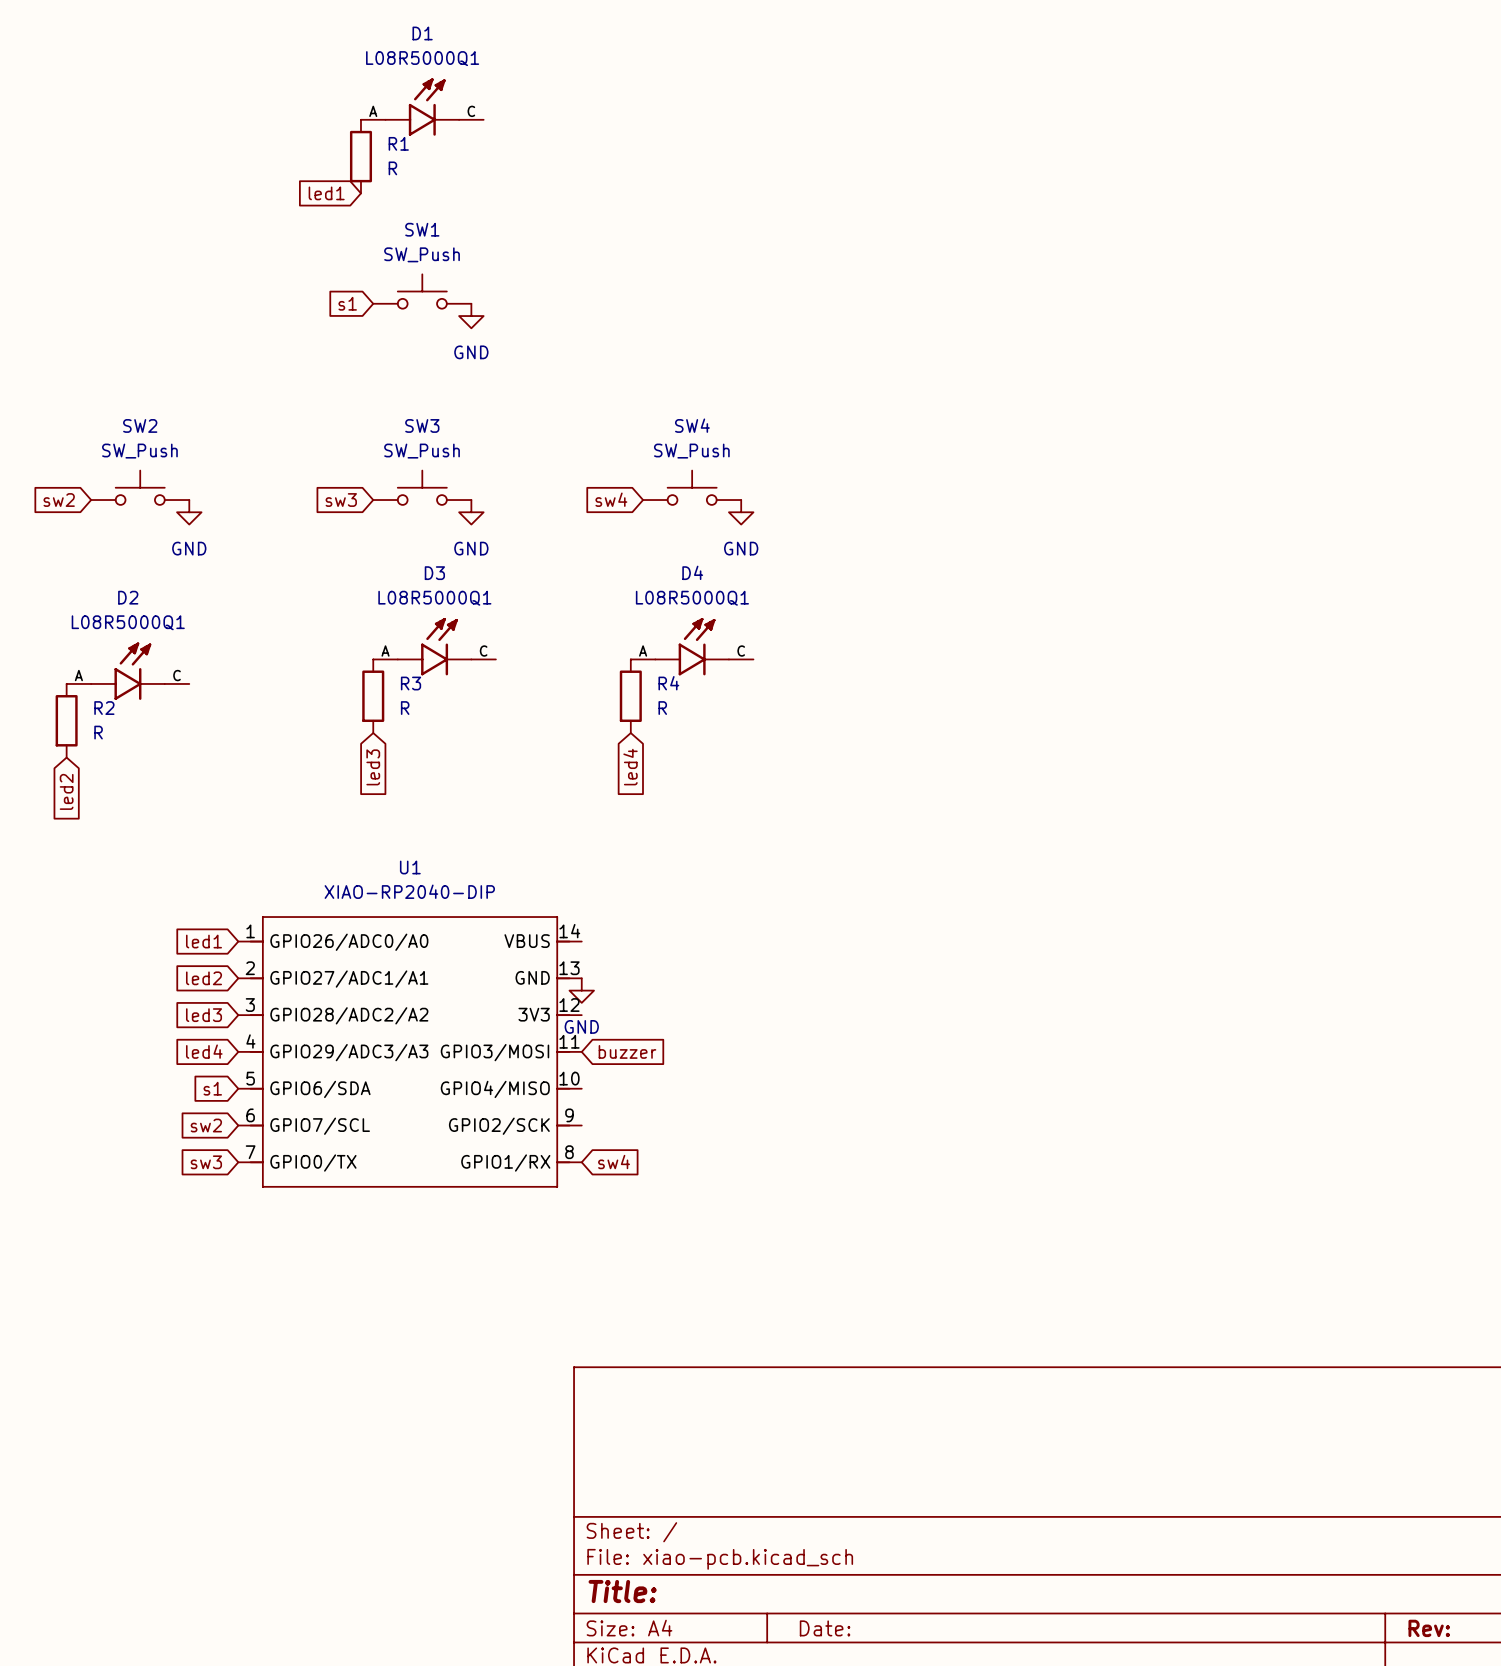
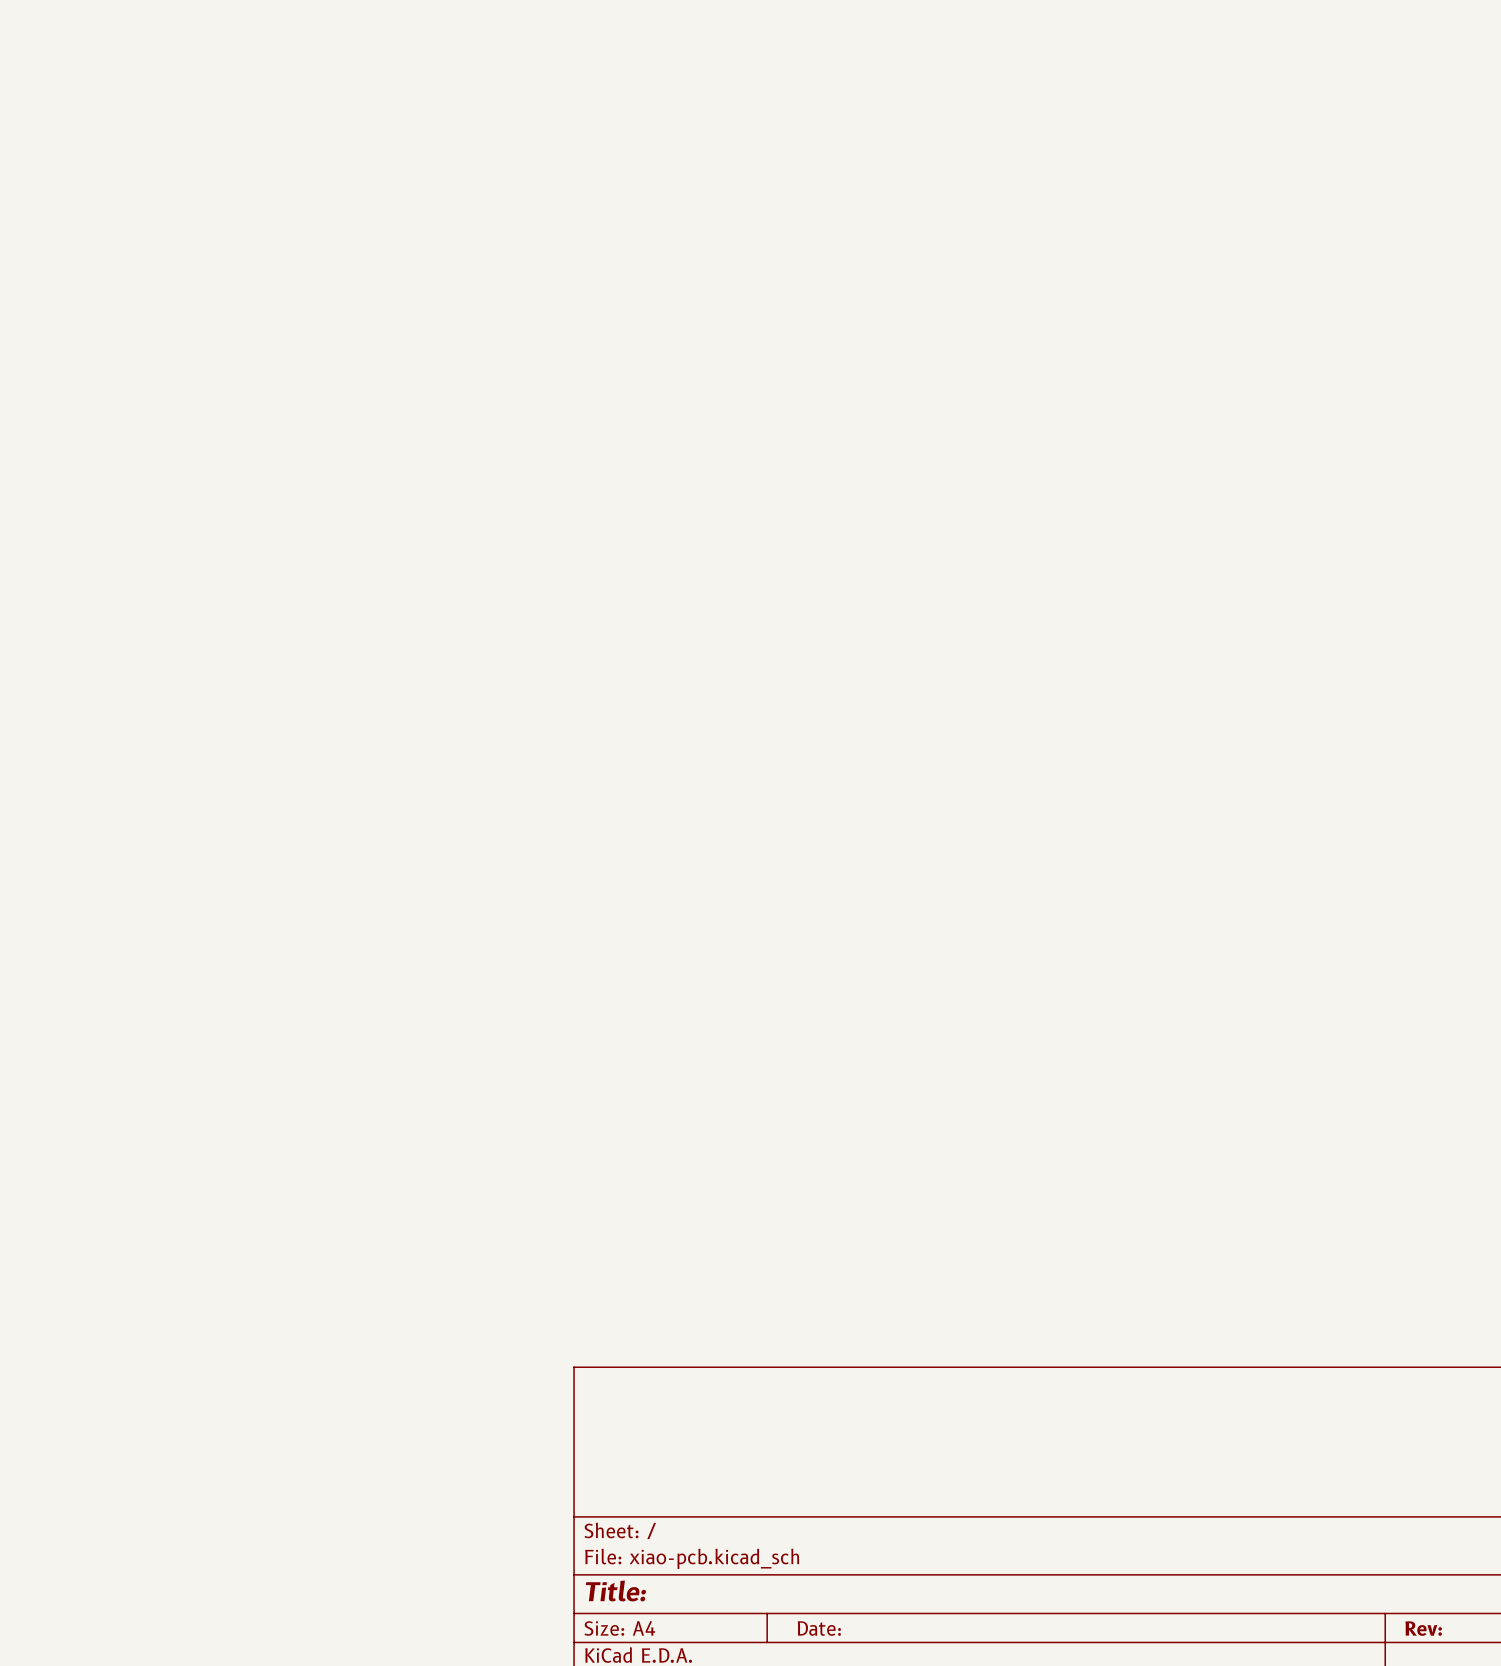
D1: L08R5000Q1 (422, 107) -> none
R1: R (360, 156) -> none
global label: led1 (326, 193) -> none
SW1: SW_Push (422, 291) -> none
global label: s1 (347, 303) -> none
power symbol: GND (471, 316) -> none
SW2: SW_Push (140, 487) -> none
SW3: SW_Push (422, 487) -> none
SW4: SW_Push (692, 487) -> none
global label: sw4 (611, 499) -> none
global label: sw2 (59, 500) -> none
global label: sw3 (341, 500) -> none
power symbol: GND (189, 512) -> none
power symbol: GND (471, 512) -> none
power symbol: GND (741, 512) -> none
D3: L08R5000Q1 (434, 646) -> none
D4: L08R5000Q1 (692, 646) -> none
D2: L08R5000Q1 (127, 671) -> none
R3: R (373, 696) -> none
R4: R (630, 696) -> none
R2: R (66, 720) -> none
global label: led3 (373, 767) -> none
global label: led4 (630, 767) -> none
global label: led2 (66, 791) -> none
global label: led1 (204, 941) -> none
global label: led2 (204, 978) -> none
power symbol: GND (581, 990) -> none
global label: led3 (204, 1015) -> none
global label: led4 (204, 1051) -> none
U1: XIAO-RP2040-DIP (410, 1051) -> none
global label: buzzer (627, 1051) -> none
global label: s1 (212, 1088) -> none
global label: sw2 (206, 1125) -> none
global label: sw3 (206, 1162) -> none
global label: sw4 (614, 1162) -> none

